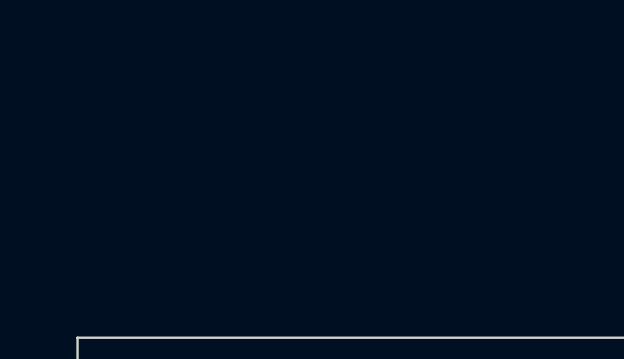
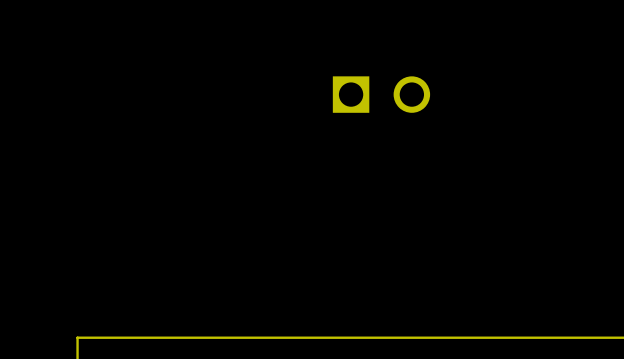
part: none -> (381, 94)

